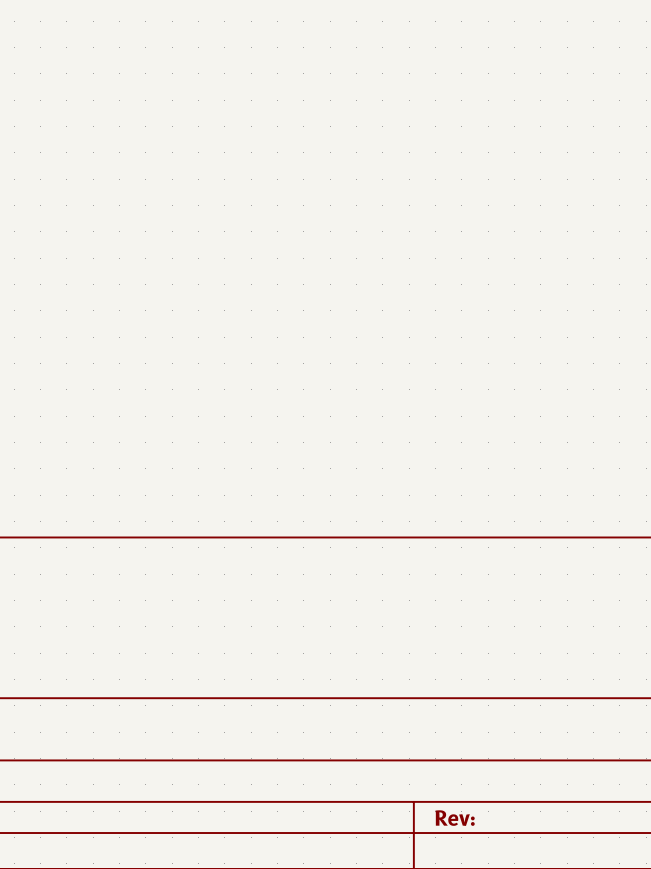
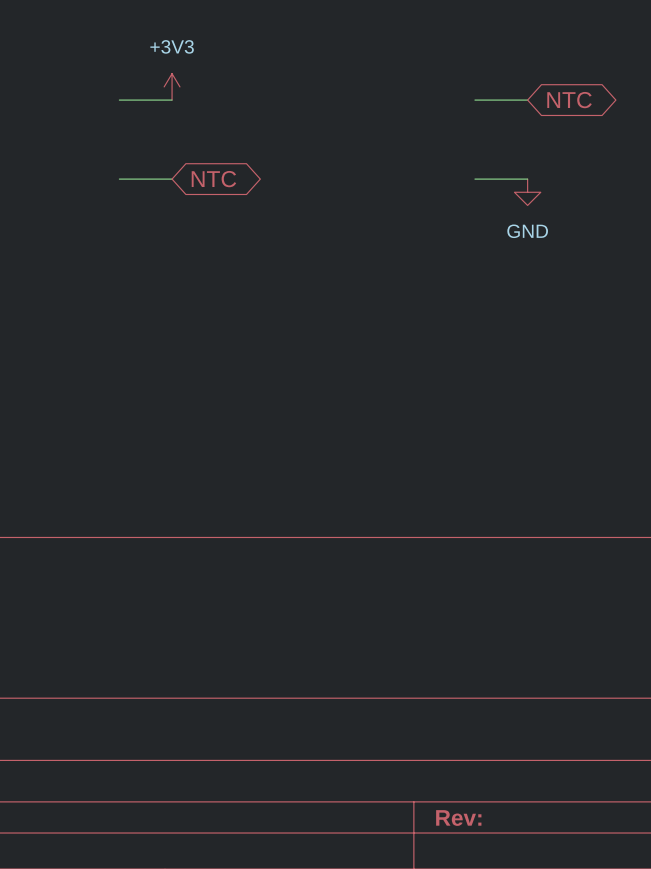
power symbol: none -> +3V3 (172, 86)
wire: none -> (119, 100) (172, 100)
wire: none -> (474, 100) (527, 100)
global label: none -> NTC (569, 100)
wire: none -> (119, 179) (172, 179)
global label: none -> NTC (213, 179)
wire: none -> (474, 179) (527, 179)
power symbol: none -> GND (527, 192)

